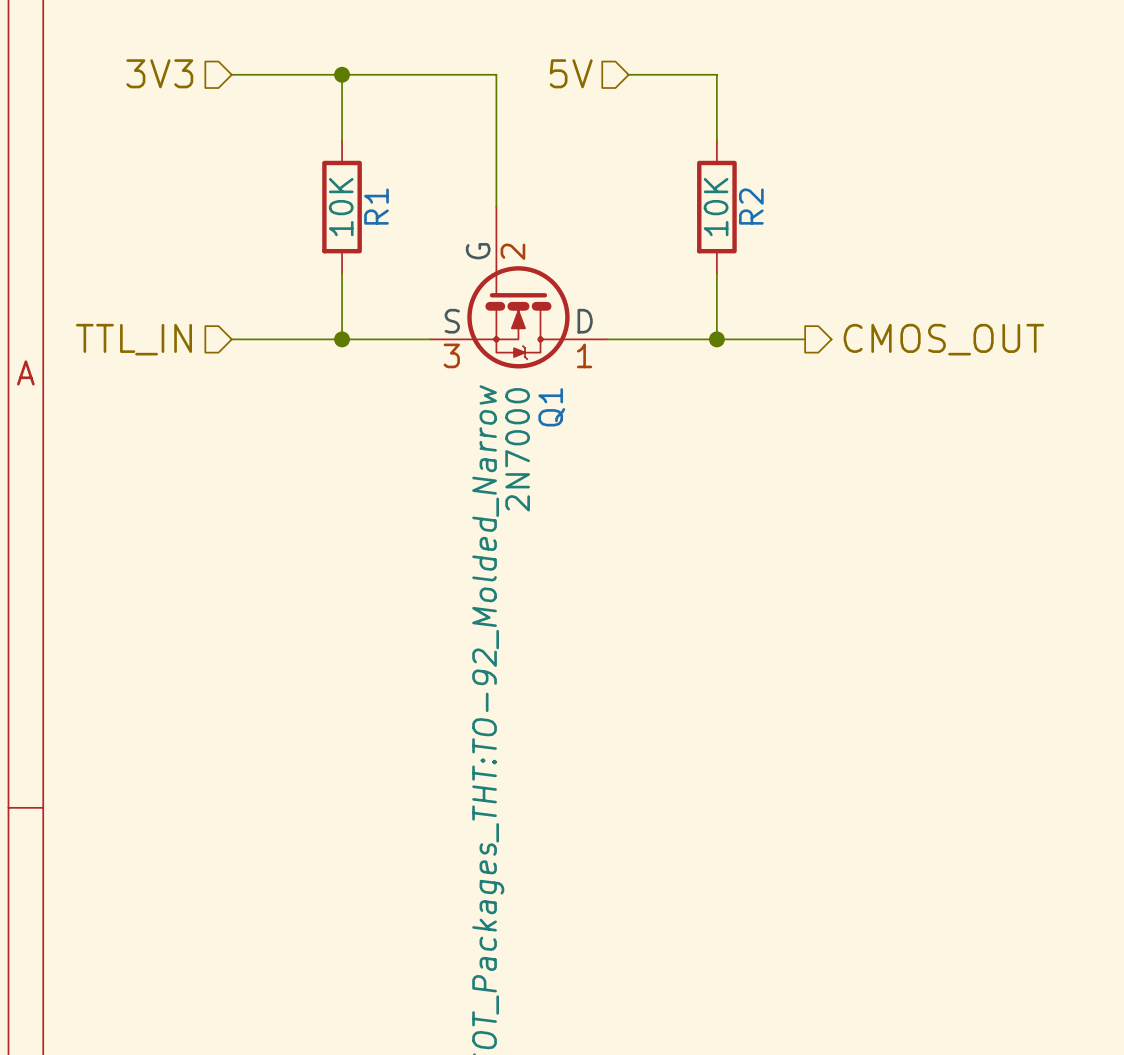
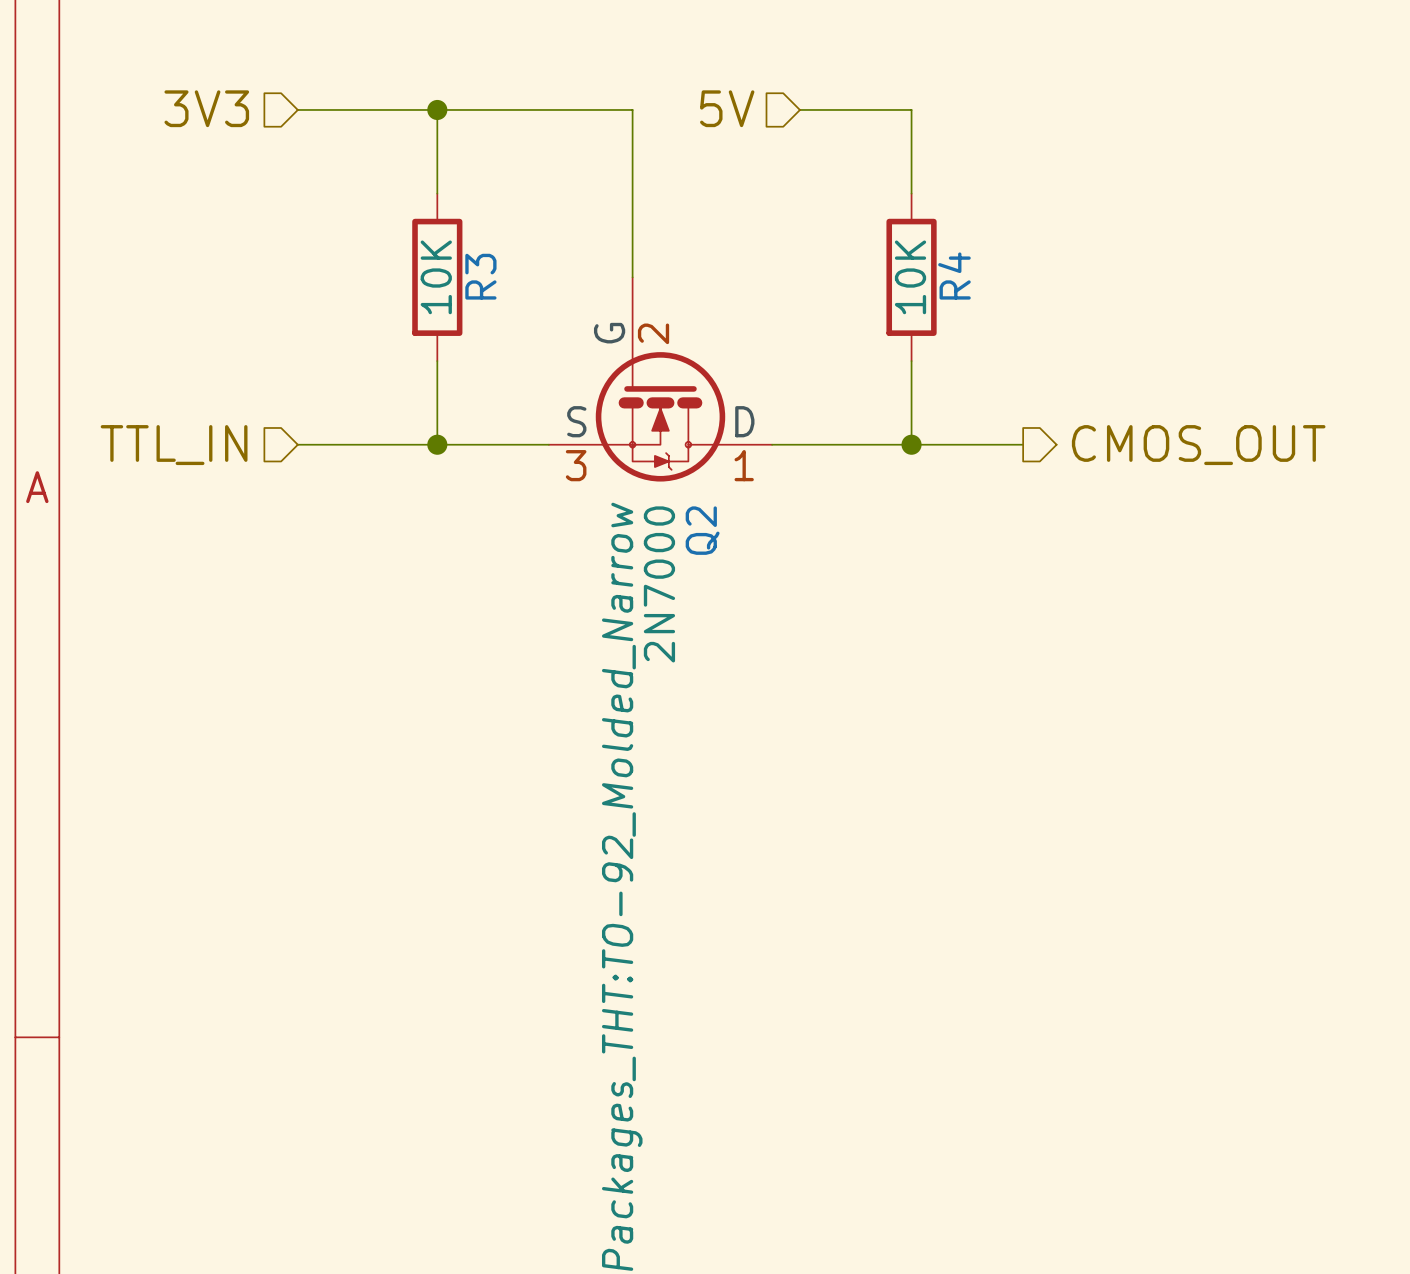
R1 name: R1 (376, 206) -> R3 (480, 276)
R2 name: R2 (751, 206) -> R4 (954, 276)
Q1 name: Q1 (551, 407) -> Q2 (702, 530)

